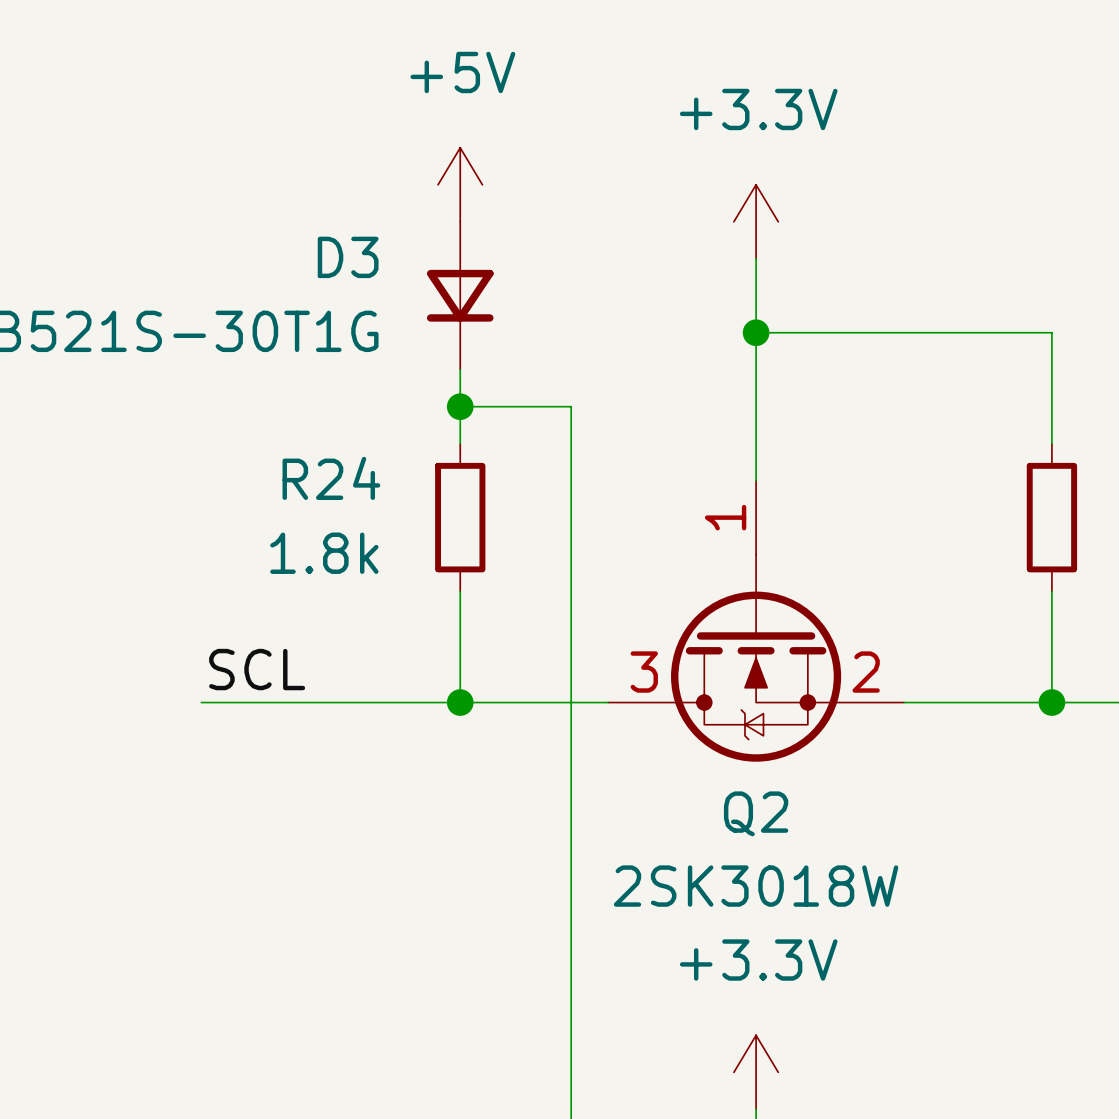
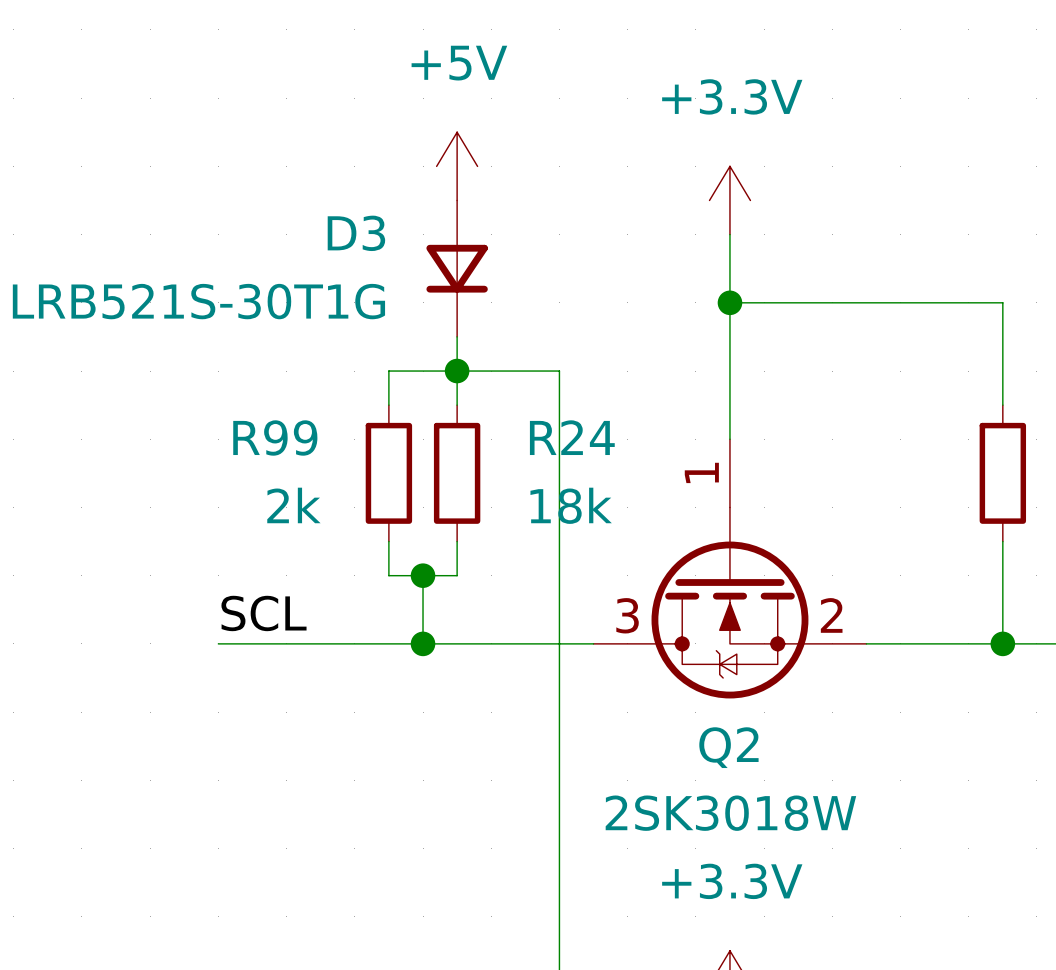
wire: none -> (457, 371) (388, 371) (388, 405)
R24 name position: R24 (331, 478) -> R24 (572, 437)
R99: none -> 2k (388, 473)
R24 value: 1.8k (324, 553) -> 18k (571, 505)
wire: none -> (423, 575) (423, 643)
junction: none -> (423, 575)
wire: (460, 628) (460, 702) -> (457, 575) (388, 575) (388, 541)
junction position: (460, 702) -> (423, 643)

